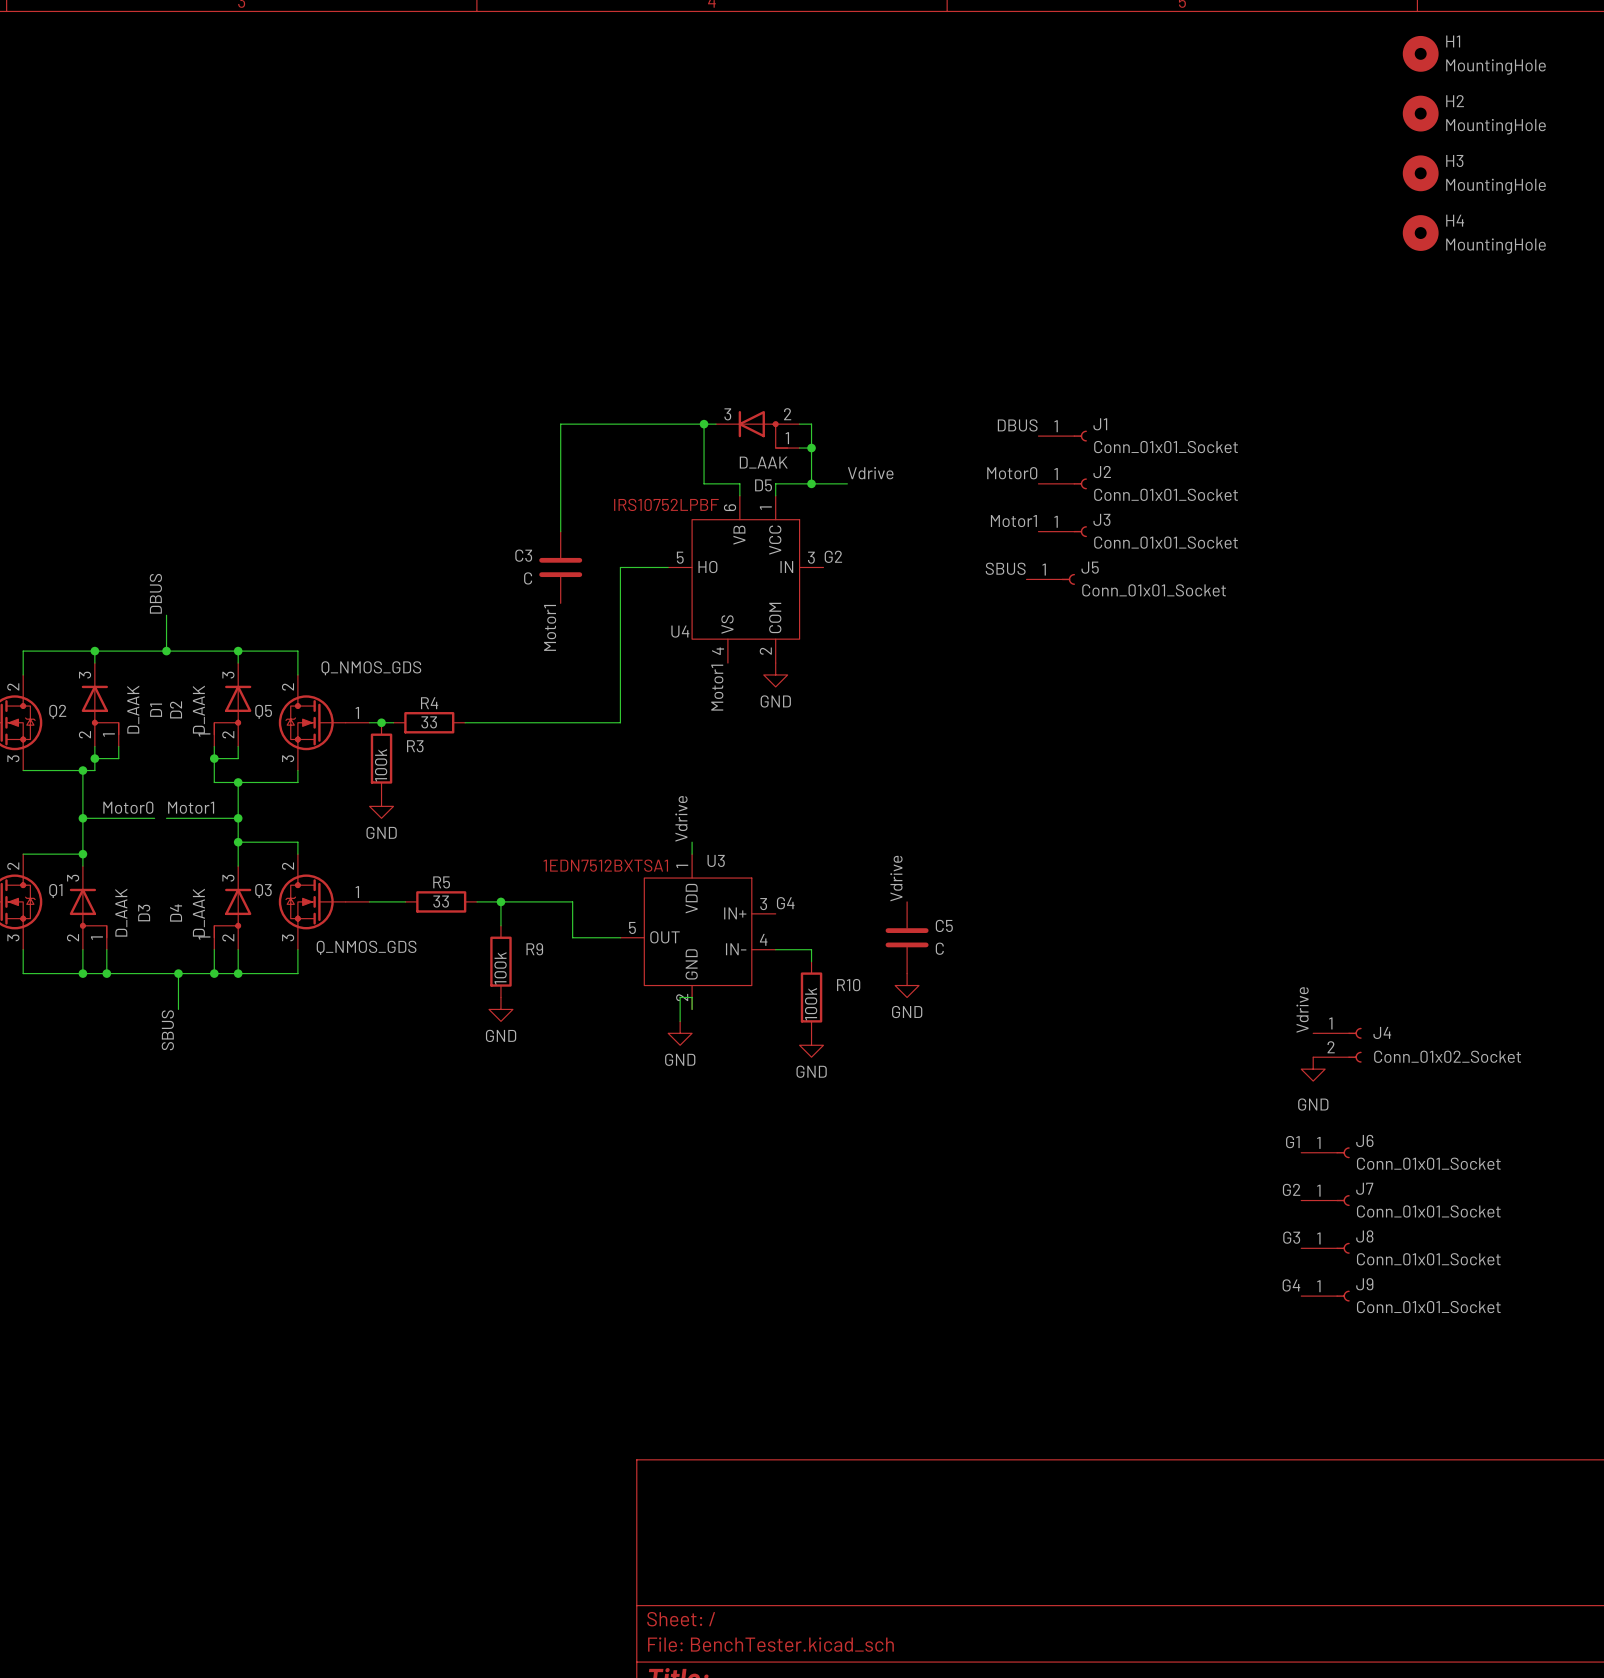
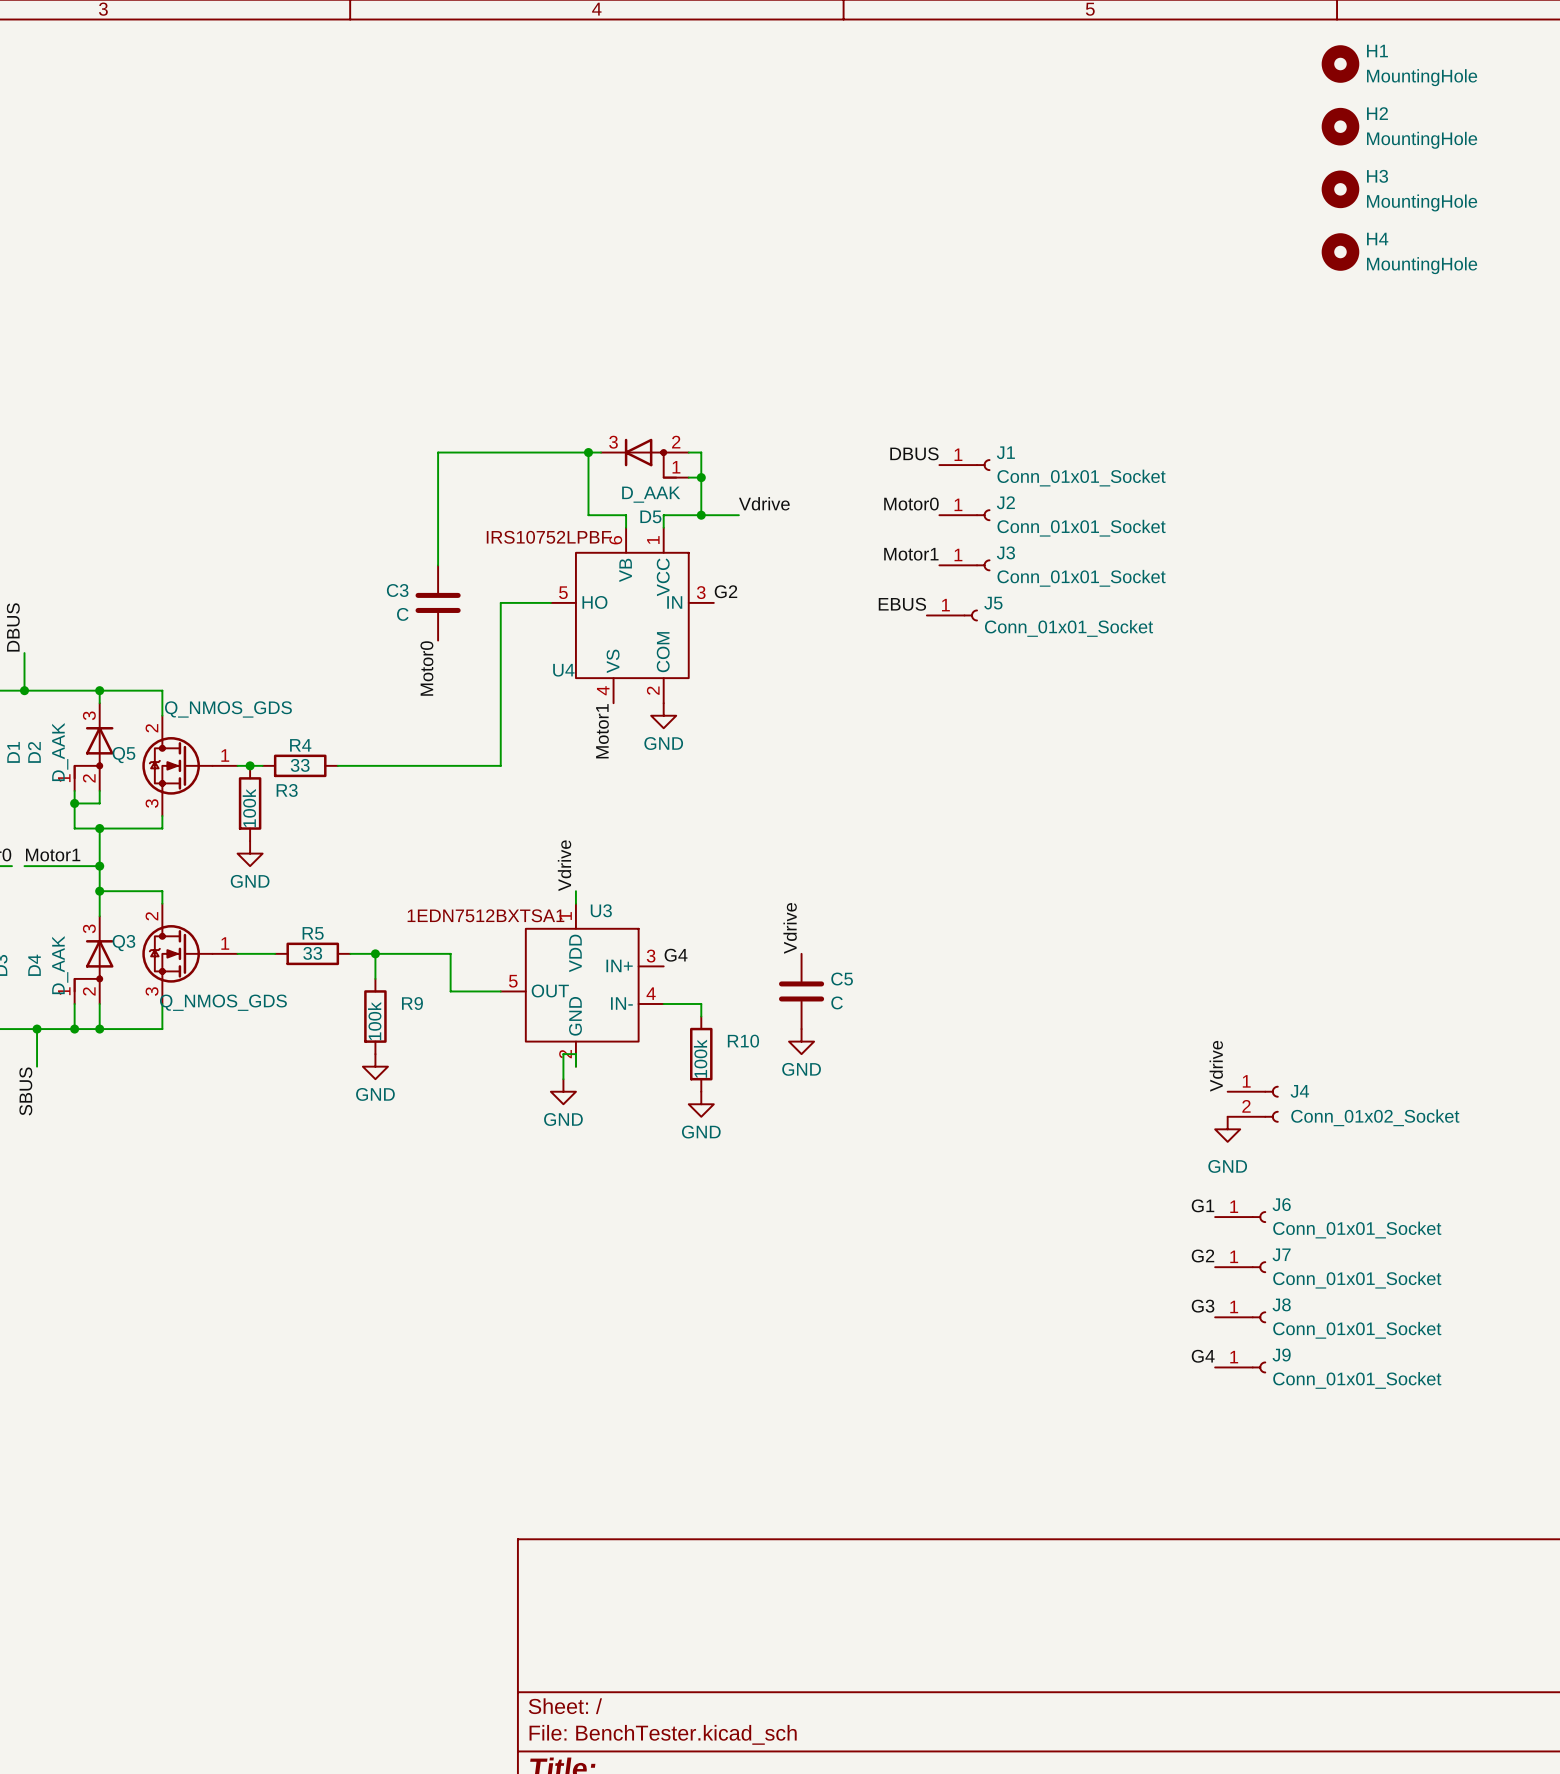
label: SBUS (1005, 568) -> EBUS (902, 604)
label: Motor1 (550, 627) -> Motor0 (426, 668)

